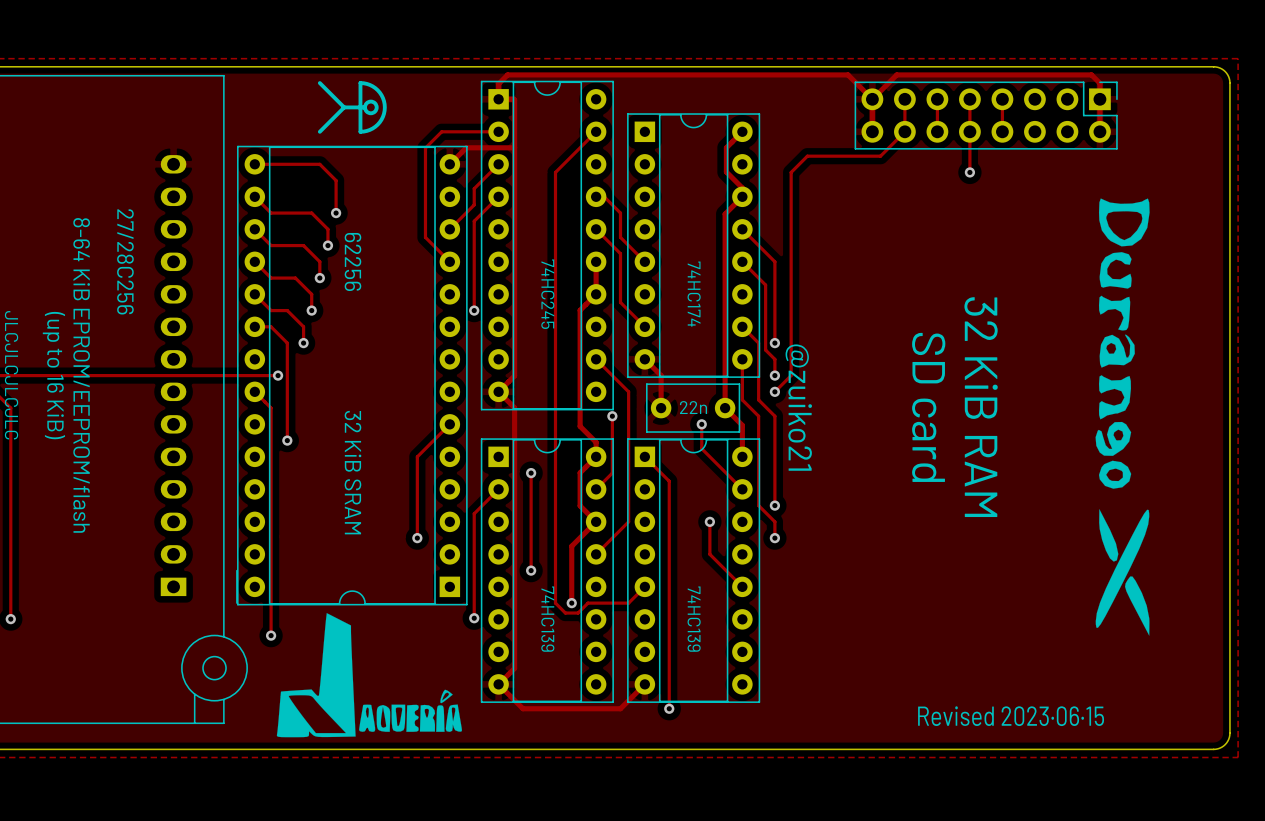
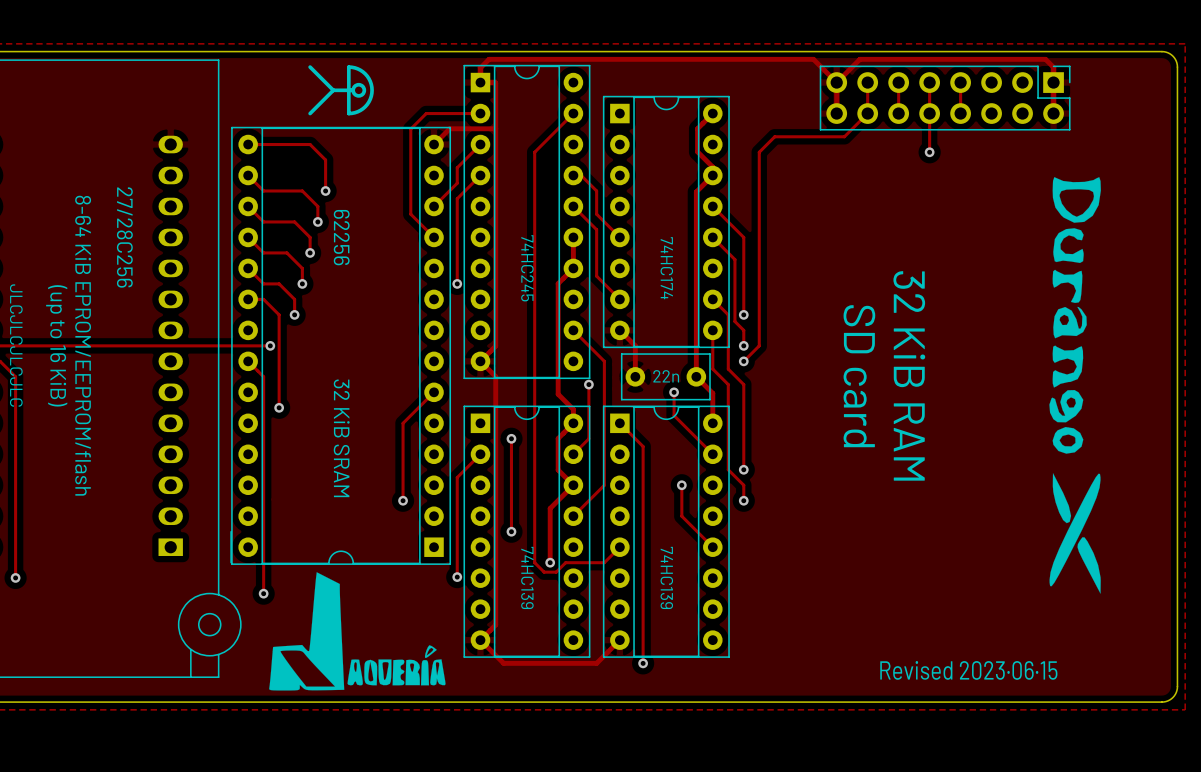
text: @zuiko21 (798, 407) -> none
text position: SD card (928, 407) -> SD card (859, 376)
text position: 32 KiB RAM (981, 407) -> 32 KiB RAM (909, 375)

